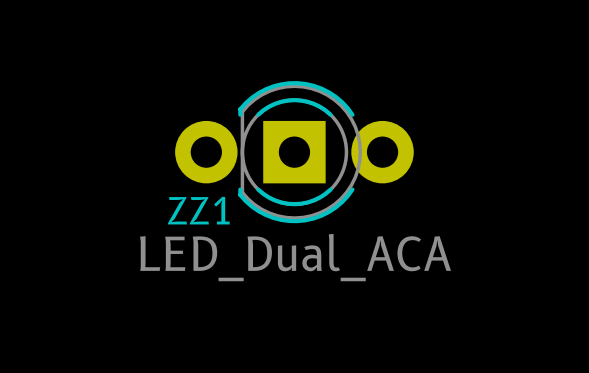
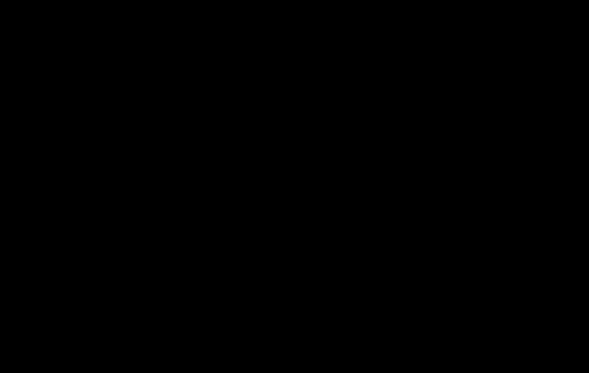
ZZ1: LED_Dual_ACA (294, 152) -> none

